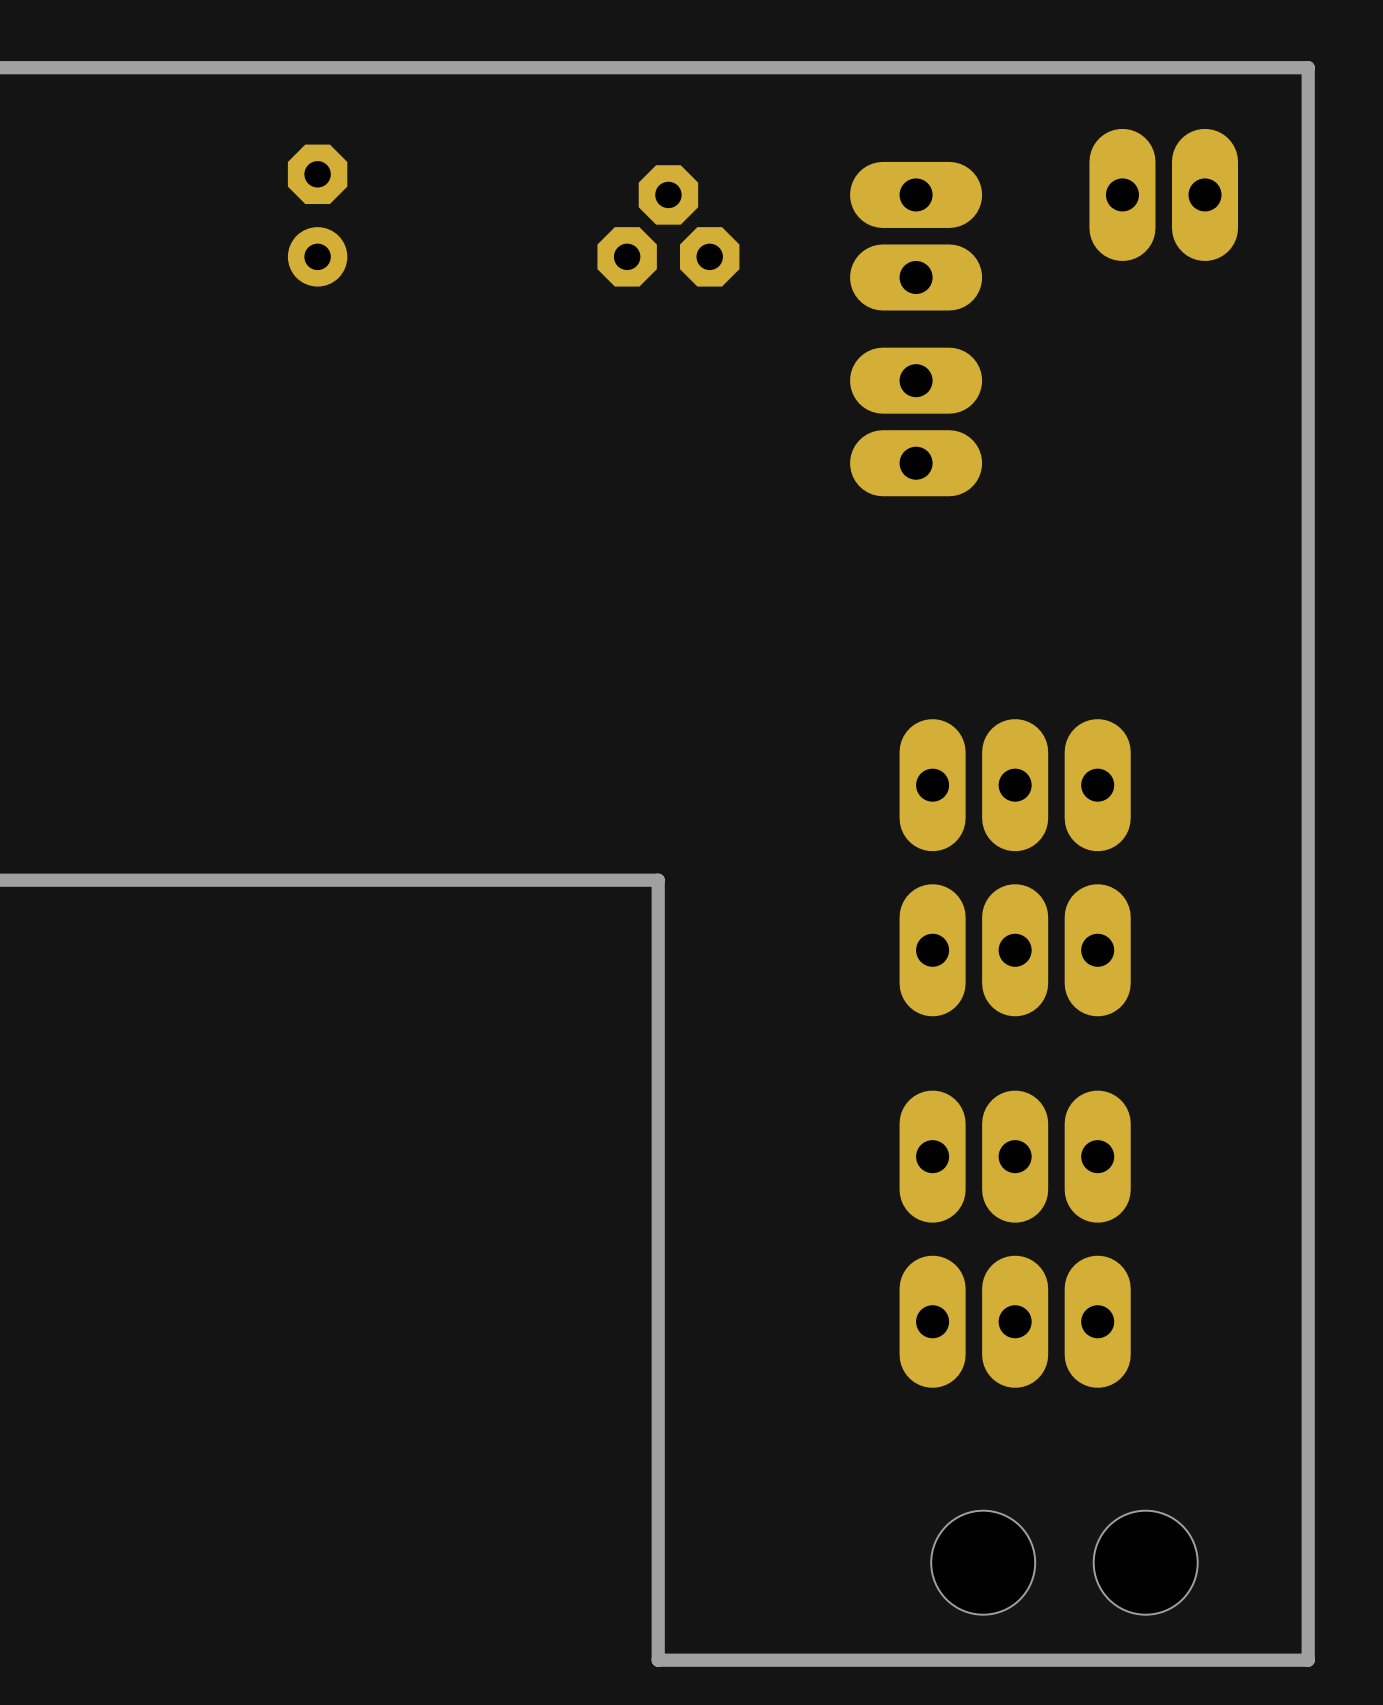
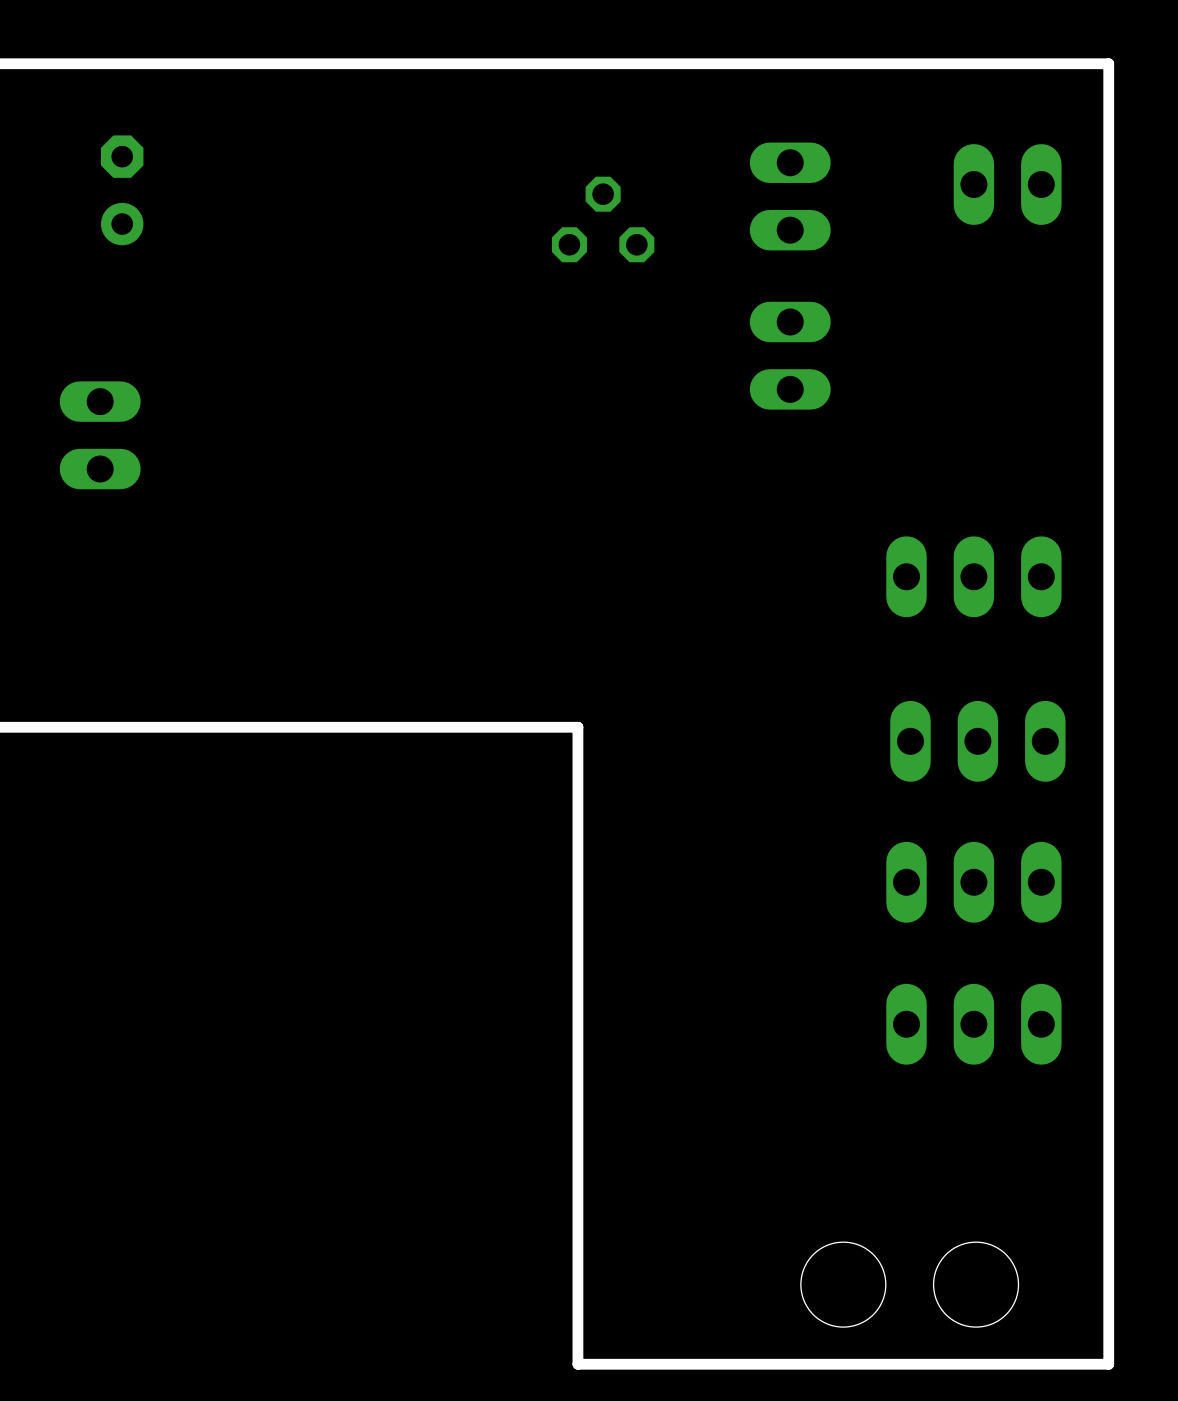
part footprint: [1089, 128, 1239, 261] -> [953, 144, 1062, 225]
part footprint: [850, 161, 983, 311] -> [749, 142, 831, 251]
part: (317, 215) -> none
part: none -> (122, 190)
part: (668, 225) -> none
part: none -> (603, 219)
part footprint: [850, 347, 983, 497] -> [749, 301, 831, 410]
part: none -> (100, 435)
part: none -> (973, 576)
part: (1015, 785) -> none
part: none -> (977, 741)
part: (1015, 950) -> none
part: none -> (973, 882)
part: (1015, 1156) -> none
part: none -> (973, 1024)
part: (1015, 1321) -> none

